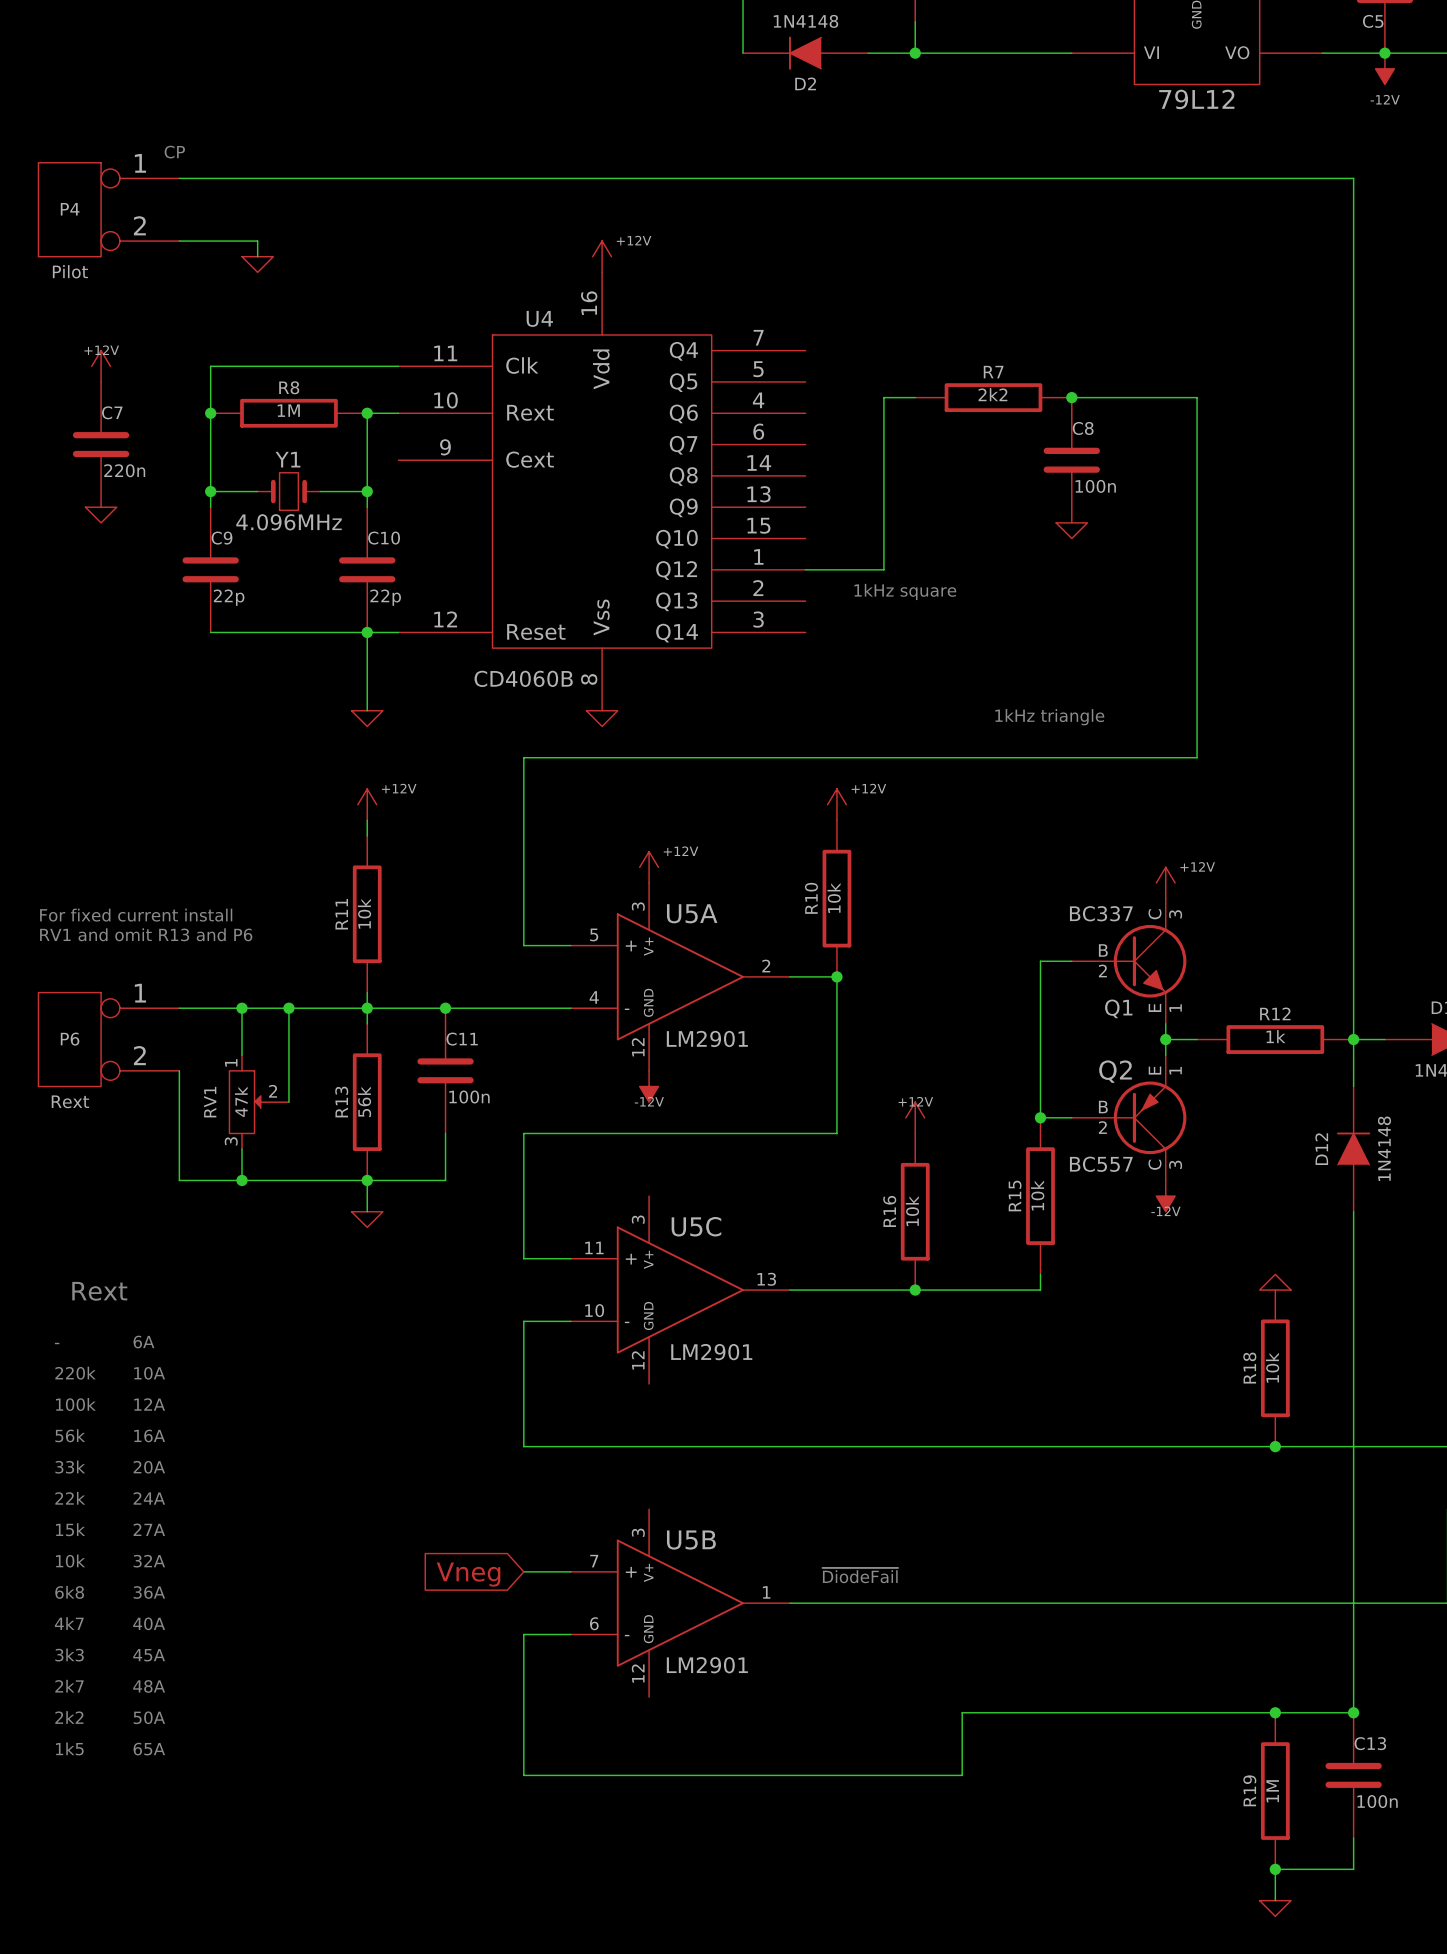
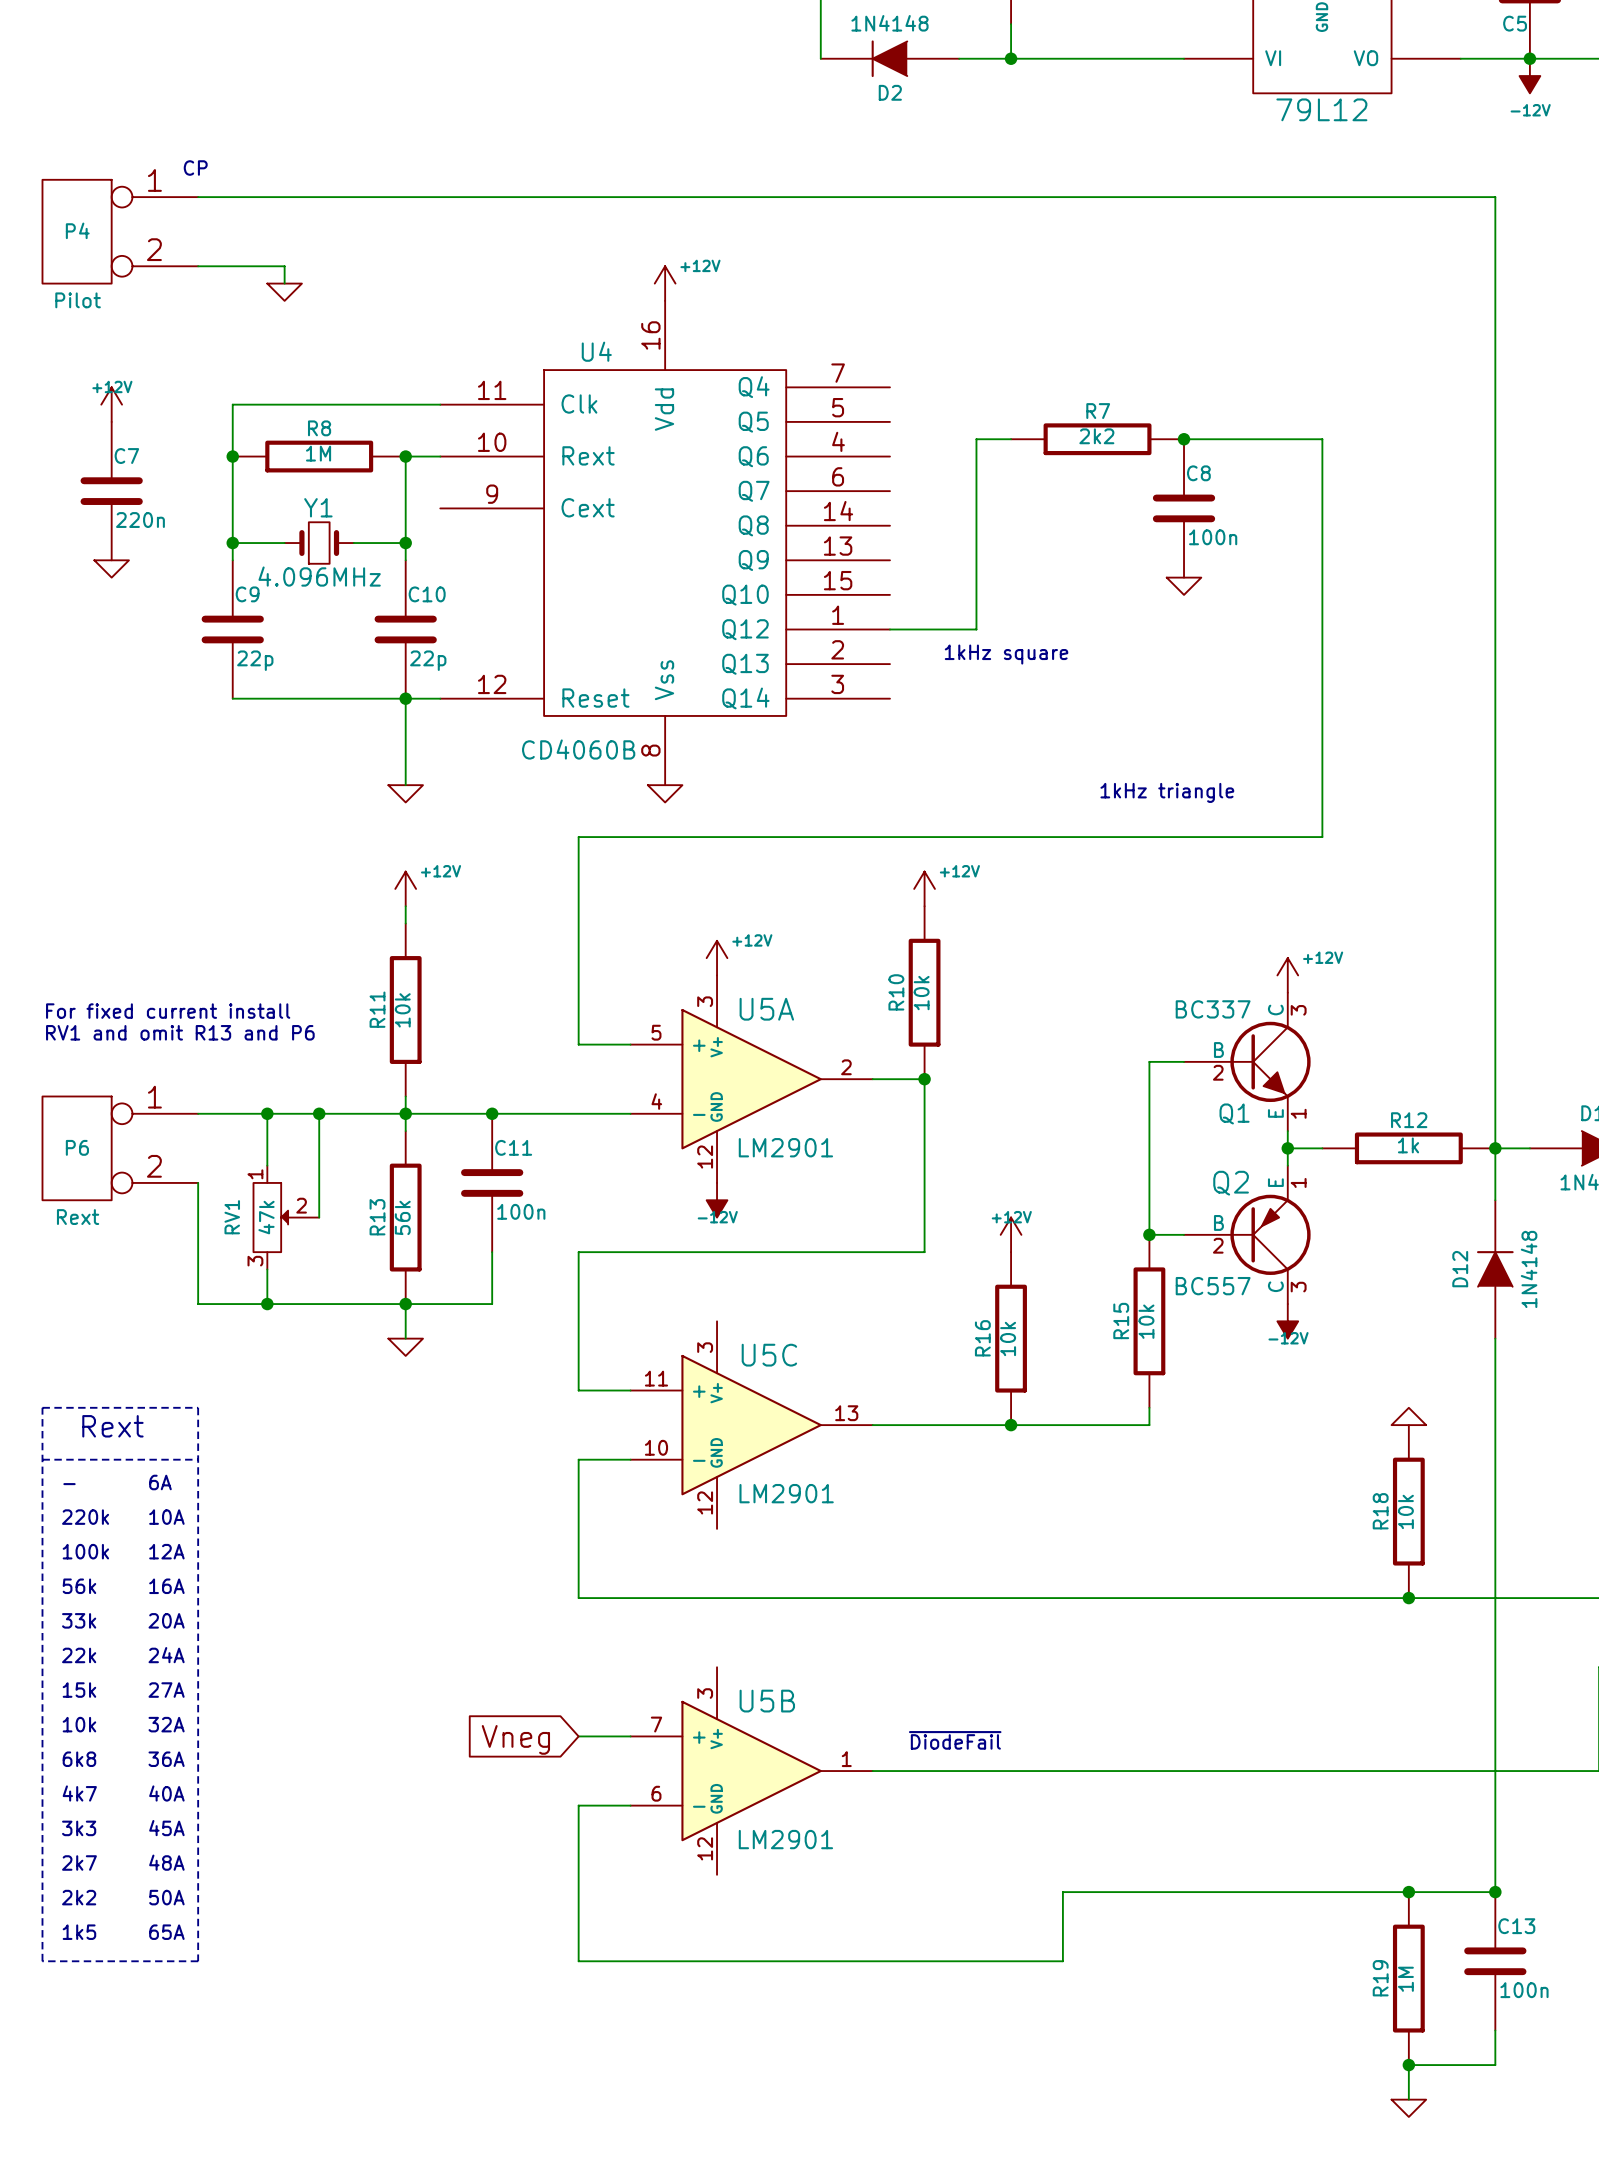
line: none -> (42, 1407) (198, 1407) (198, 1961) (42, 1961) (42, 1407)
line: none -> (42, 1459) (198, 1459)

